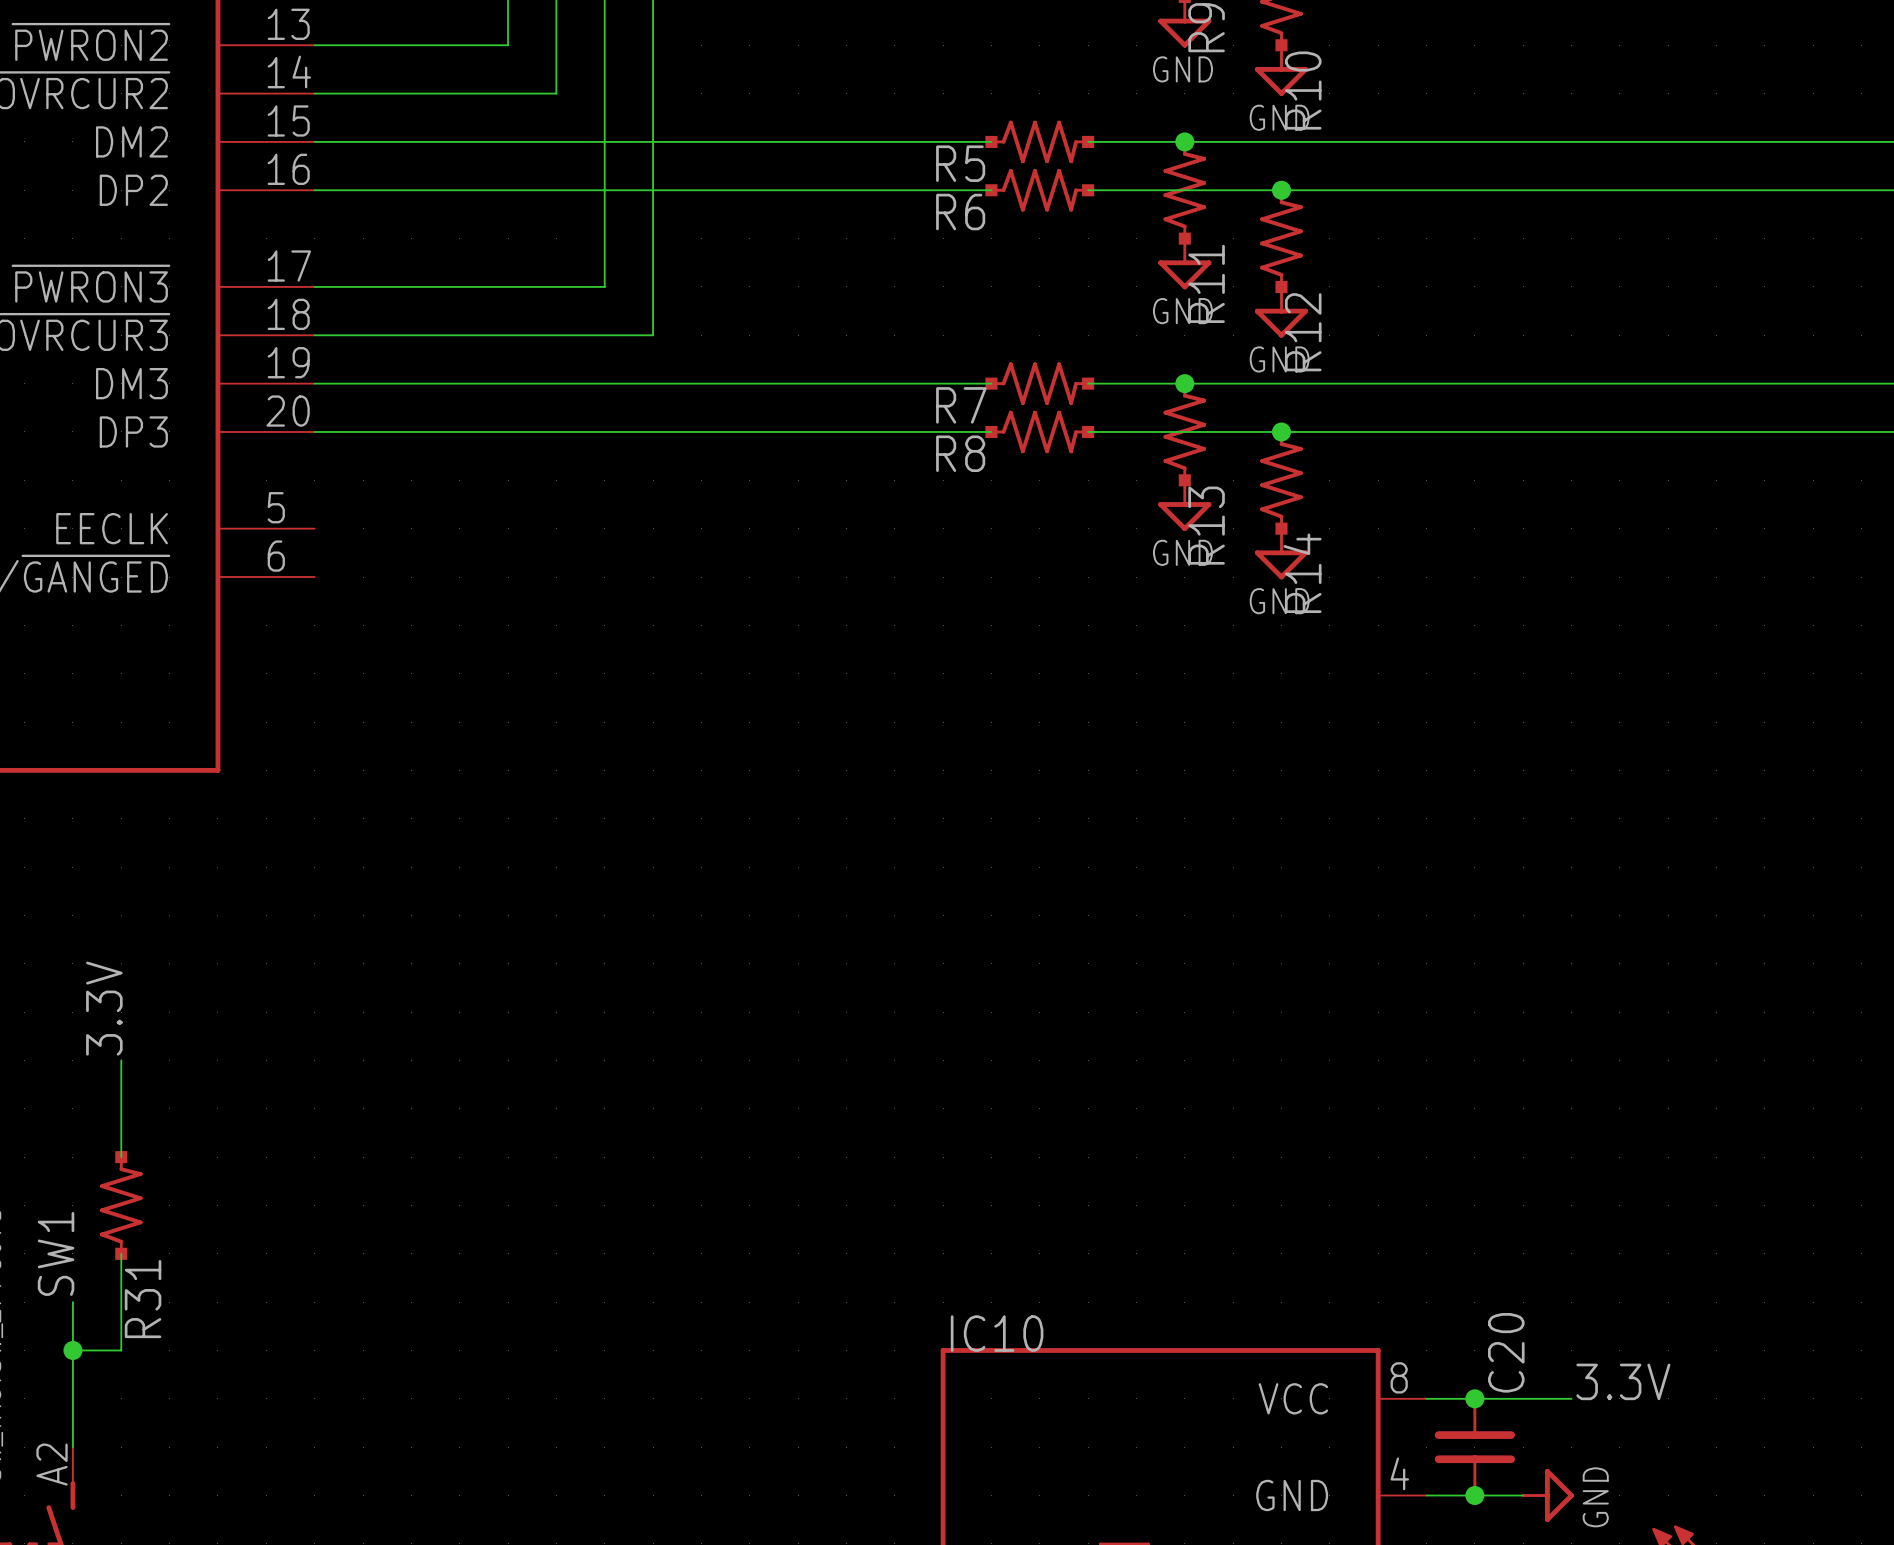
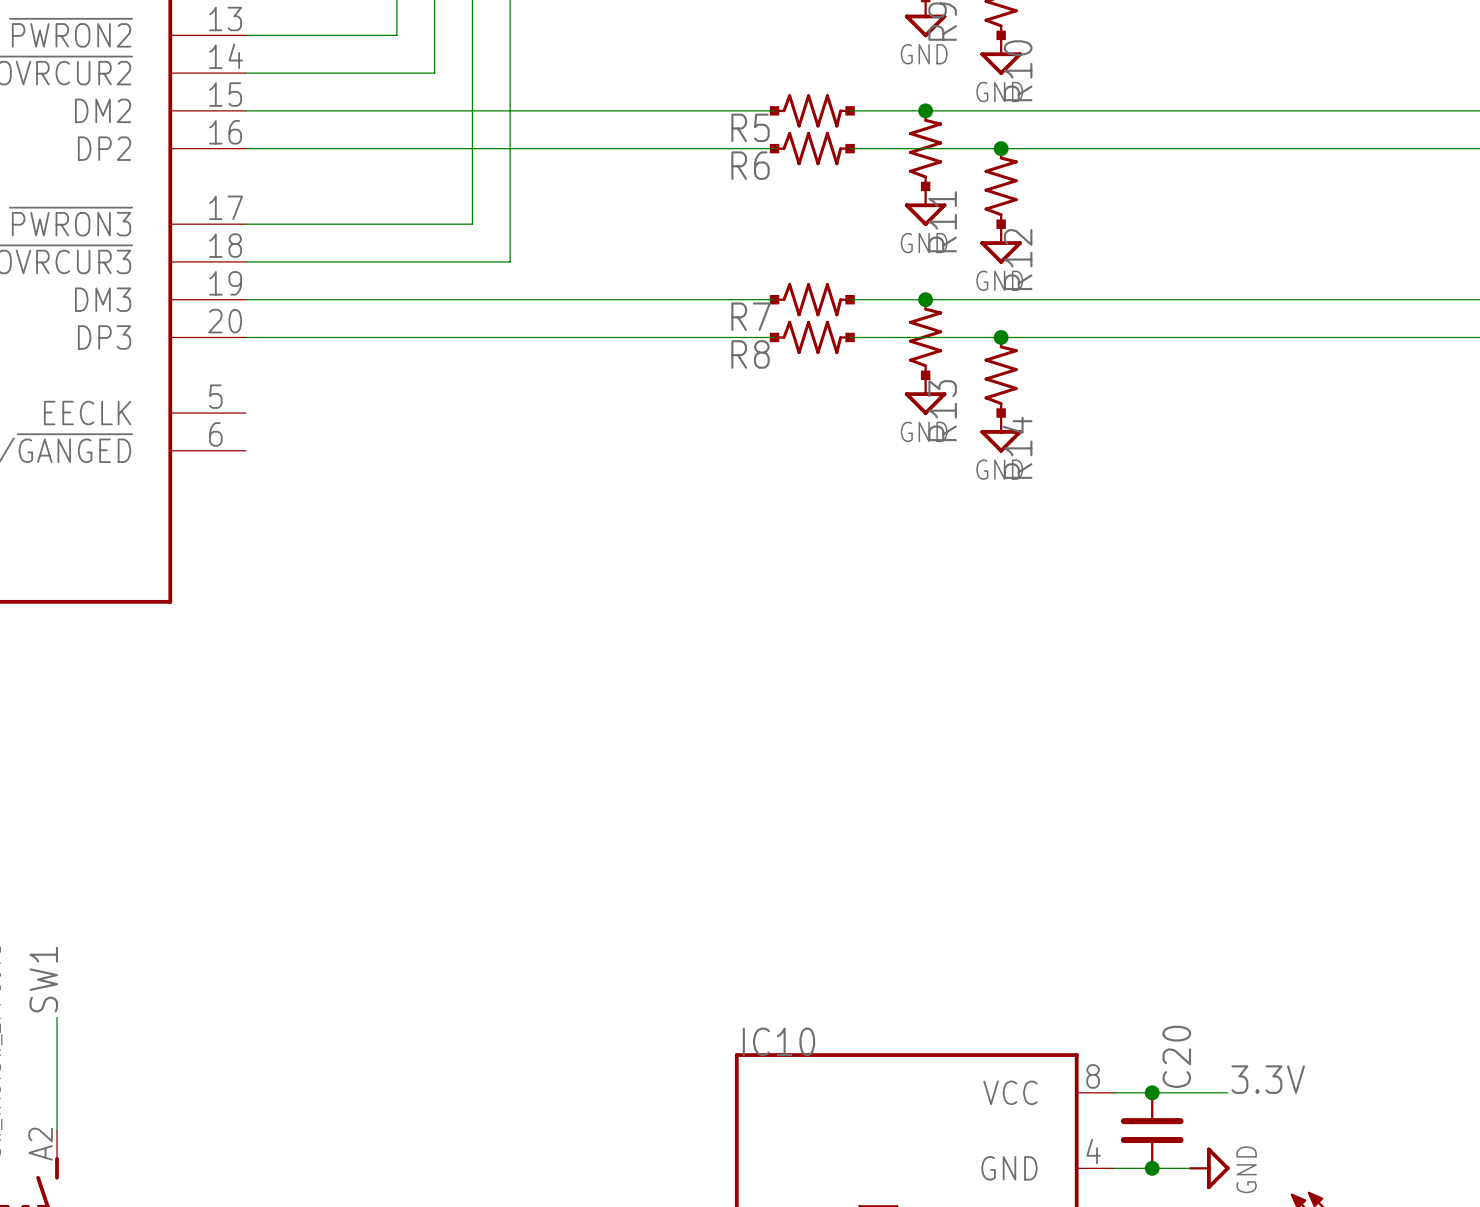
label: 3.3V (104, 1008) -> none
wire: (121, 1060) (121, 1157) -> none
R31: (121, 1205) -> none
wire: (121, 1253) (121, 1350) (72, 1350) -> none
junction: (72, 1350) -> none

